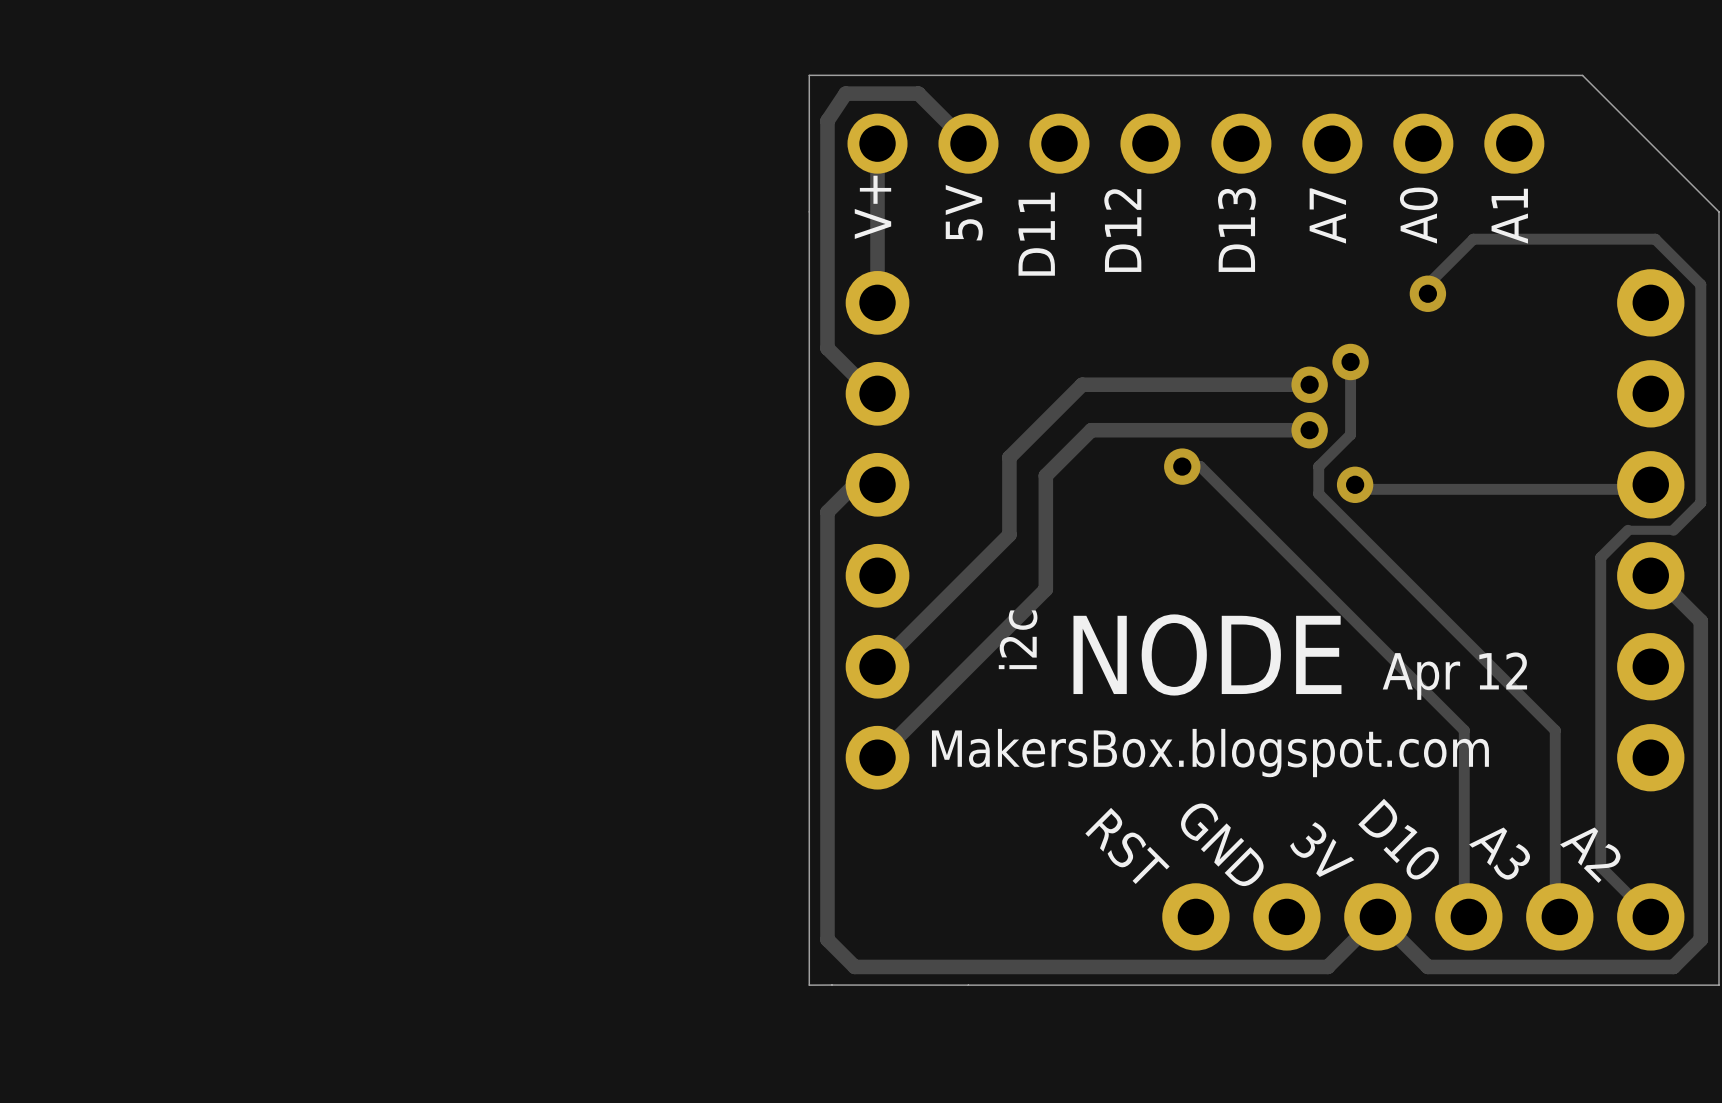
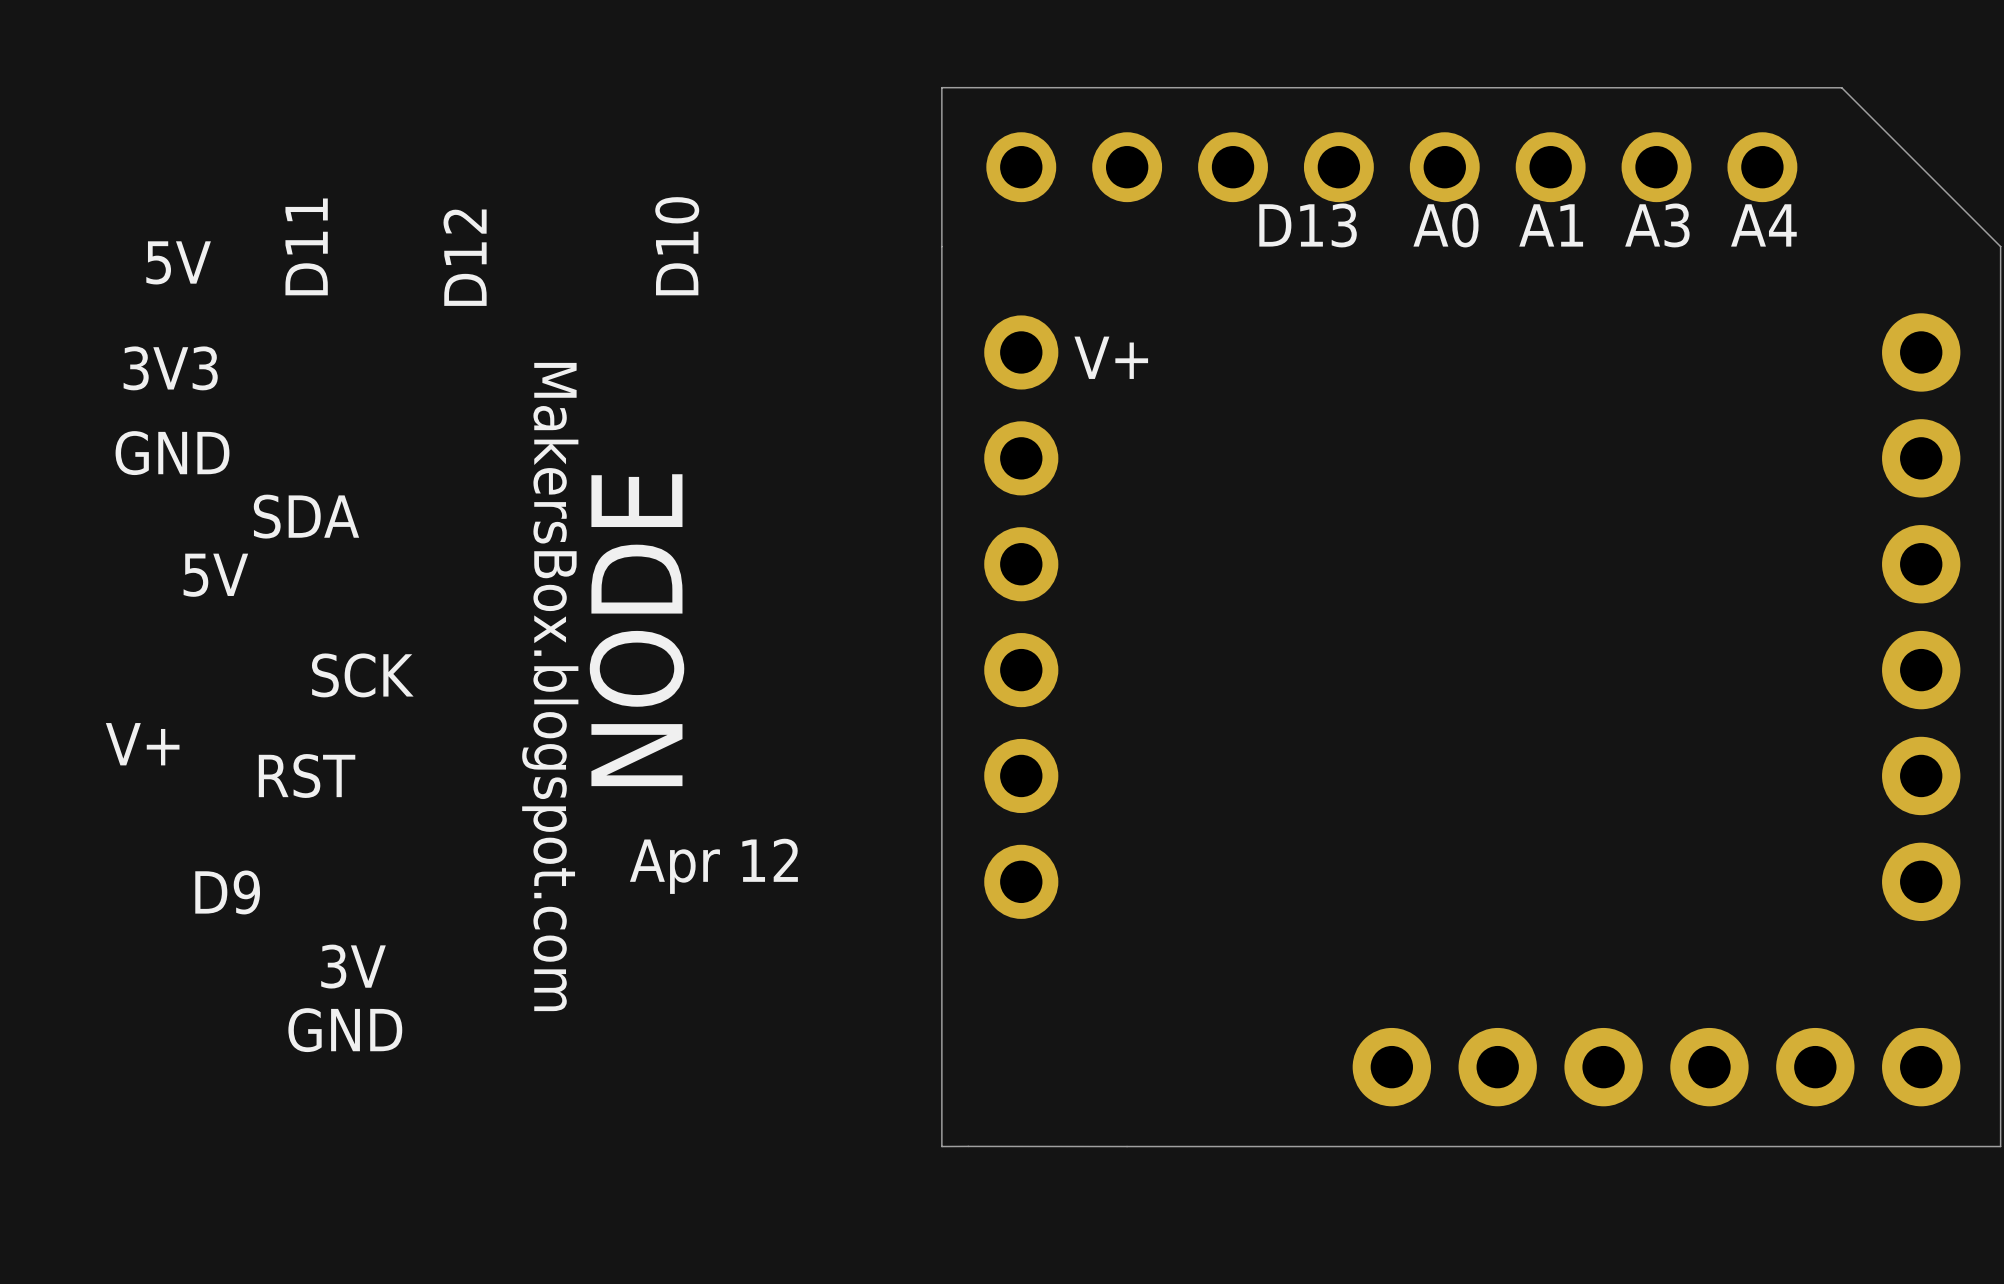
track: (877, 143) (877, 302) -> none
track: (968, 143) (918, 93) (845, 93) (827, 120) (827, 348) (872, 393) (877, 393) -> none
text: none -> A4 (1763, 225)
text rotation: 0° (872, 207) -> 90° clockwise (1111, 357)
text position: V+ (872, 207) -> V+ (1111, 357)
text: none -> D10 (677, 246)
text: 5V (964, 212) -> none
text: A7 (1327, 215) -> none
text rotation: 0° (1418, 215) -> 90° clockwise (1445, 225)
text position: A0 (1418, 215) -> A0 (1445, 225)
text rotation: 0° (1509, 216) -> 90° clockwise (1551, 225)
text position: A1 (1509, 216) -> A1 (1551, 225)
text: none -> 5V (178, 262)
text position: D12 (1122, 230) -> D12 (465, 257)
text rotation: 0° (1236, 230) -> 90° clockwise (1308, 225)
text position: D11 (1036, 234) -> D11 (306, 246)
track: (1427, 293) (1427, 284) (1473, 239) (1655, 239) (1700, 284) (1700, 502) (1673, 530) (1628, 530) (1600, 557) (1600, 866) (1650, 916) -> none
via: (1427, 293) -> none
text: none -> 3V3 (170, 368)
track: (1350, 361) (1350, 434) (1318, 466) (1318, 493) (1555, 730) (1555, 912) (1559, 916) -> none
via: (1350, 361) -> none
track: (1309, 384) (1082, 384) (1009, 457) (1009, 534) (877, 666) -> none
via: (1309, 384) -> none
text: none -> GND (172, 453)
track: (1309, 430) (1091, 430) (1045, 475) (1045, 589) (877, 757) -> none
via: (1309, 430) -> none
text: none -> SDA (306, 516)
track: (1182, 466) (1200, 466) (1464, 730) (1464, 912) (1468, 916) -> none
via: (1182, 466) -> none
track: (877, 484) (854, 484) (827, 512) (827, 939) (854, 966) (1327, 966) (1377, 916) (1427, 966) (1673, 966) (1700, 939) (1700, 621) (1655, 575) (1650, 575) -> none
via: (1355, 484) -> none
track: (1650, 484) (1650, 489) (1359, 489) (1355, 484) -> none
text: none -> 5V (215, 575)
text: none -> SCK (362, 675)
text: none -> V+ (142, 744)
text: i2c (1018, 639) -> none
text rotation: 0° (1207, 654) -> 90° counterclockwise (637, 630)
text position: NODE (1207, 654) -> NODE (637, 630)
text position: Apr 12 (1454, 676) -> Apr 12 (713, 866)
text rotation: 0° (1210, 753) -> 90° clockwise (550, 687)
text position: MakersBox.blogspot.com (1210, 753) -> MakersBox.blogspot.com (550, 687)
text: none -> D9 (227, 892)
text: none -> 3V (353, 966)
text: D10 (1399, 839) -> none
text: GND (1222, 844) -> none
text rotation: 0° (1127, 845) -> 45° counterclockwise (307, 776)
text position: RST (1127, 845) -> RST (307, 776)
text: 3V (1322, 849) -> none
text rotation: 0° (1499, 853) -> 45° counterclockwise (1657, 225)
text position: A3 (1499, 853) -> A3 (1657, 225)
text: A2 (1590, 855) -> none
text: none -> GND (345, 1030)

